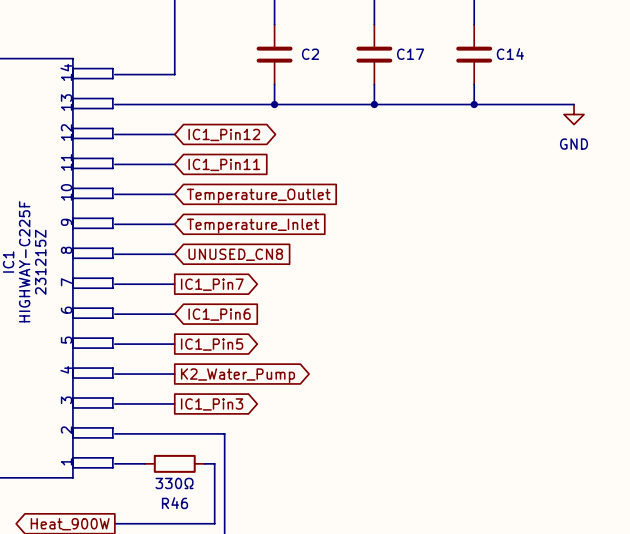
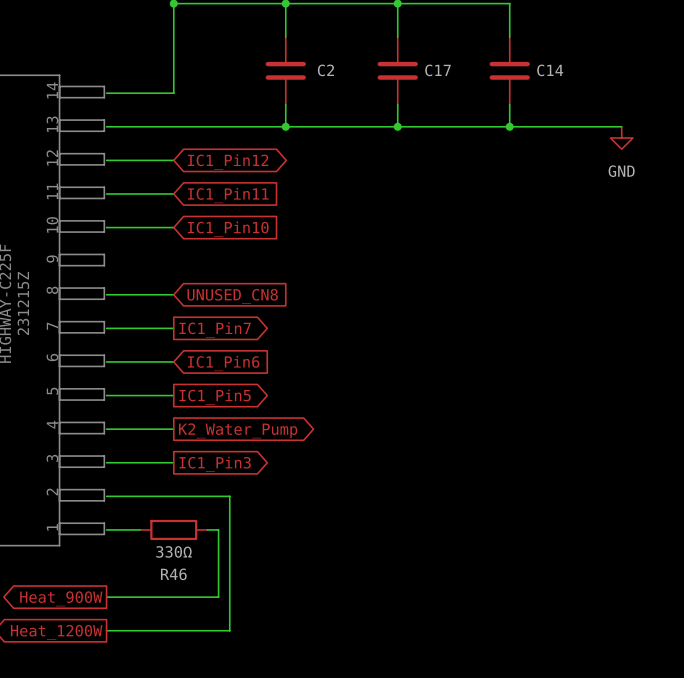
global label: Temperature_Outlet (258, 196) -> IC1_Pin10 (228, 229)
wire: (114, 224) (174, 224) -> none
global label: Temperature_Inlet (253, 225) -> none

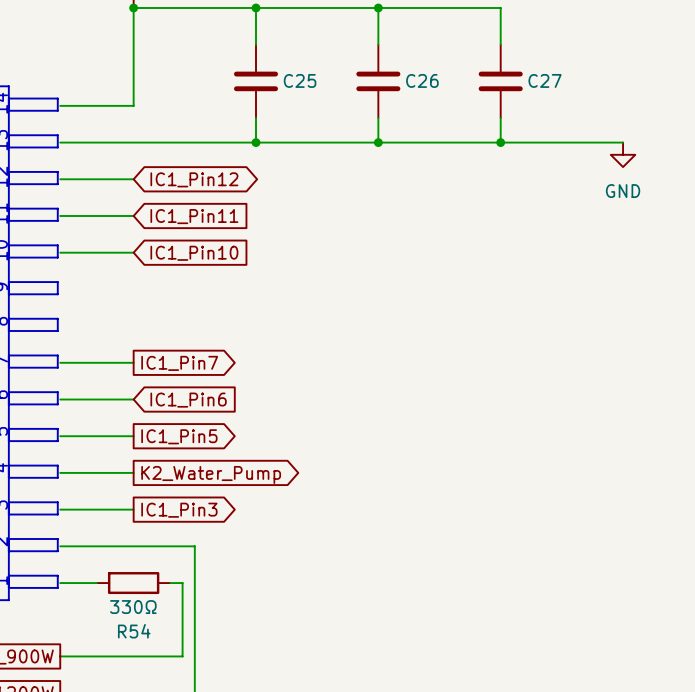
C2 name: C2 (325, 70) -> C25 (300, 80)
C17 name: C17 (438, 70) -> C26 (422, 80)
C14 name: C14 (550, 70) -> C27 (545, 80)
wire: (106, 294) (173, 294) -> none
global label: UNUSED_CN8 (232, 296) -> none
R46 name: R46 (173, 574) -> R54 (134, 631)

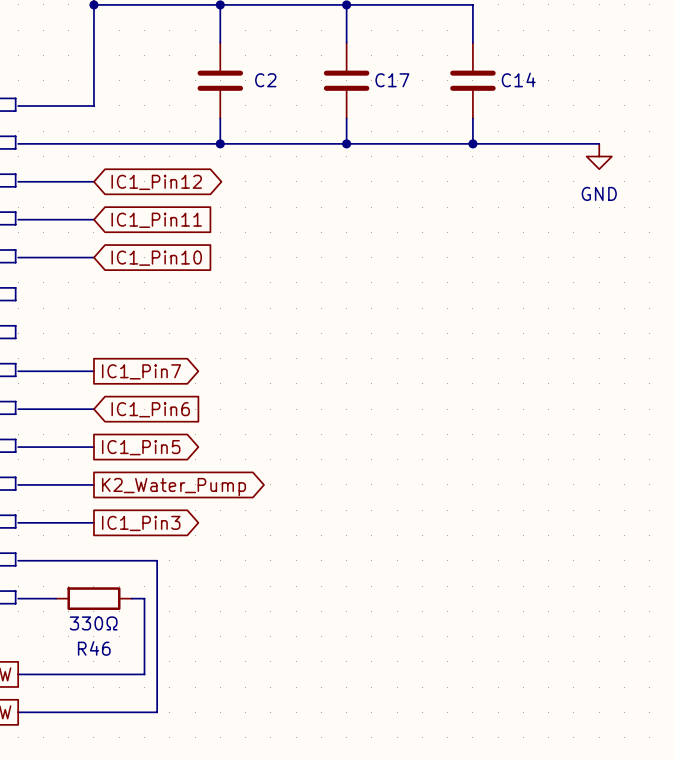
C25 name: C25 (300, 80) -> C2 (265, 80)
C26 name: C26 (422, 80) -> C17 (392, 80)
C27 name: C27 (545, 80) -> C14 (518, 79)
R54 name: R54 (134, 631) -> R46 (94, 648)

